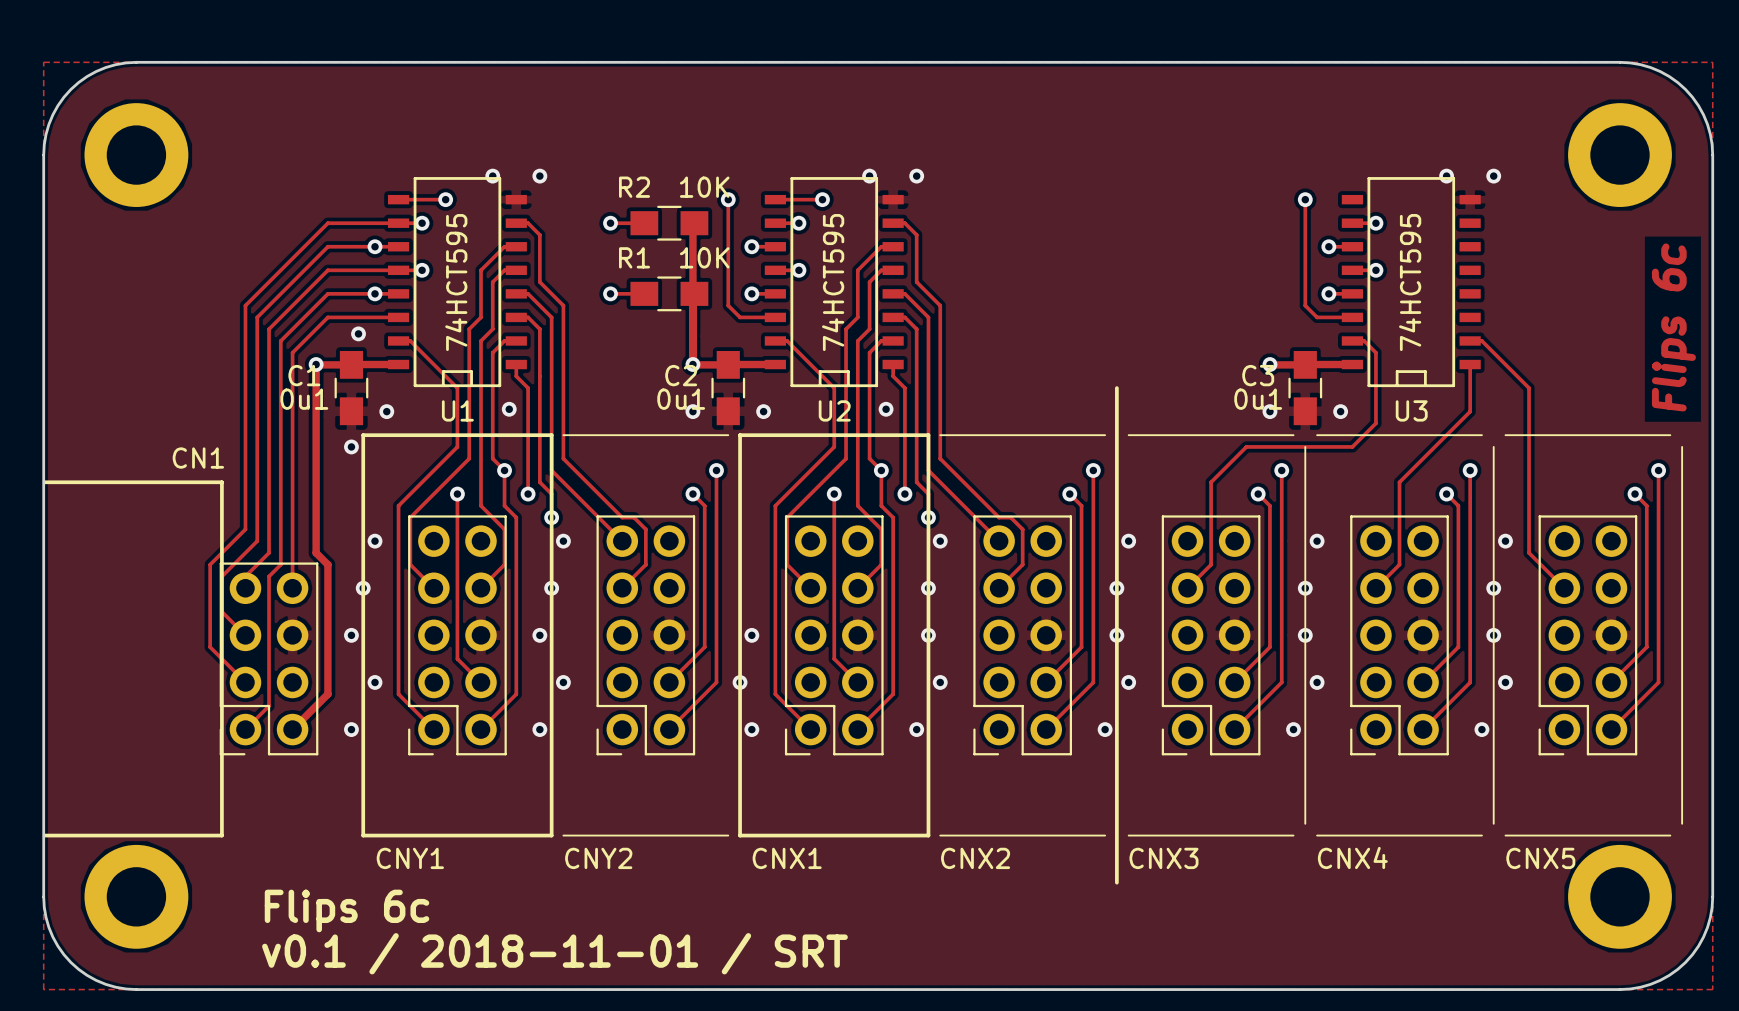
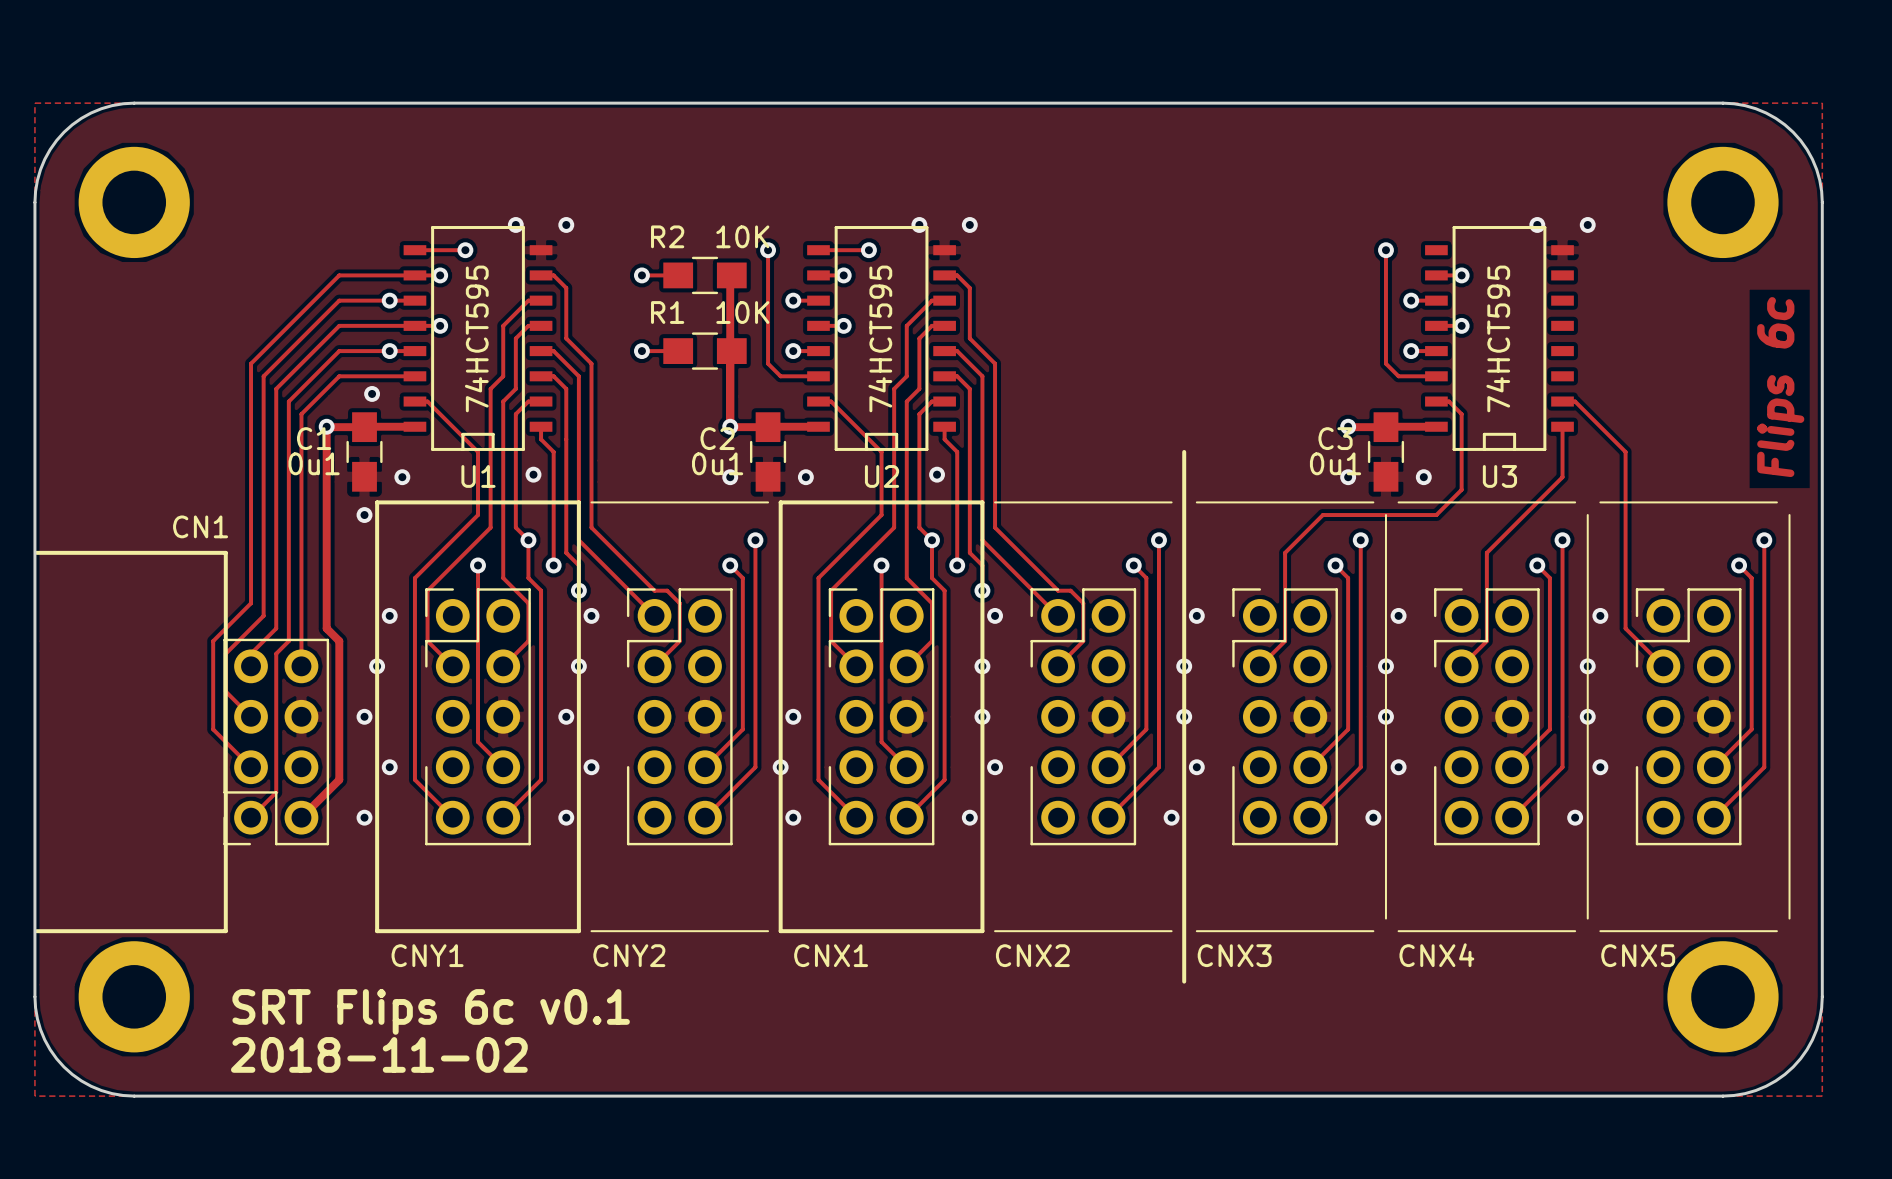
CNY1 footprint: [408, 515, 507, 756] -> [425, 588, 531, 846]
CNY2 footprint: [596, 515, 696, 756] -> [626, 588, 733, 846]
CNX1 footprint: [784, 515, 884, 756] -> [828, 588, 935, 846]
CNX2 footprint: [973, 515, 1073, 756] -> [1030, 588, 1137, 846]
CNX3 footprint: [1161, 515, 1261, 756] -> [1232, 588, 1338, 846]
CNX4 footprint: [1350, 515, 1449, 756] -> [1434, 588, 1540, 846]
CNX5 footprint: [1538, 515, 1638, 756] -> [1635, 588, 1742, 846]
text: Flips 6c (347, 910) -> SRT Flips 6c v0.1 (431, 1011)
text: none -> 2018-11-02 (379, 1054)
text: v0.1 / 2018-11-01 / SRT (554, 953) -> none

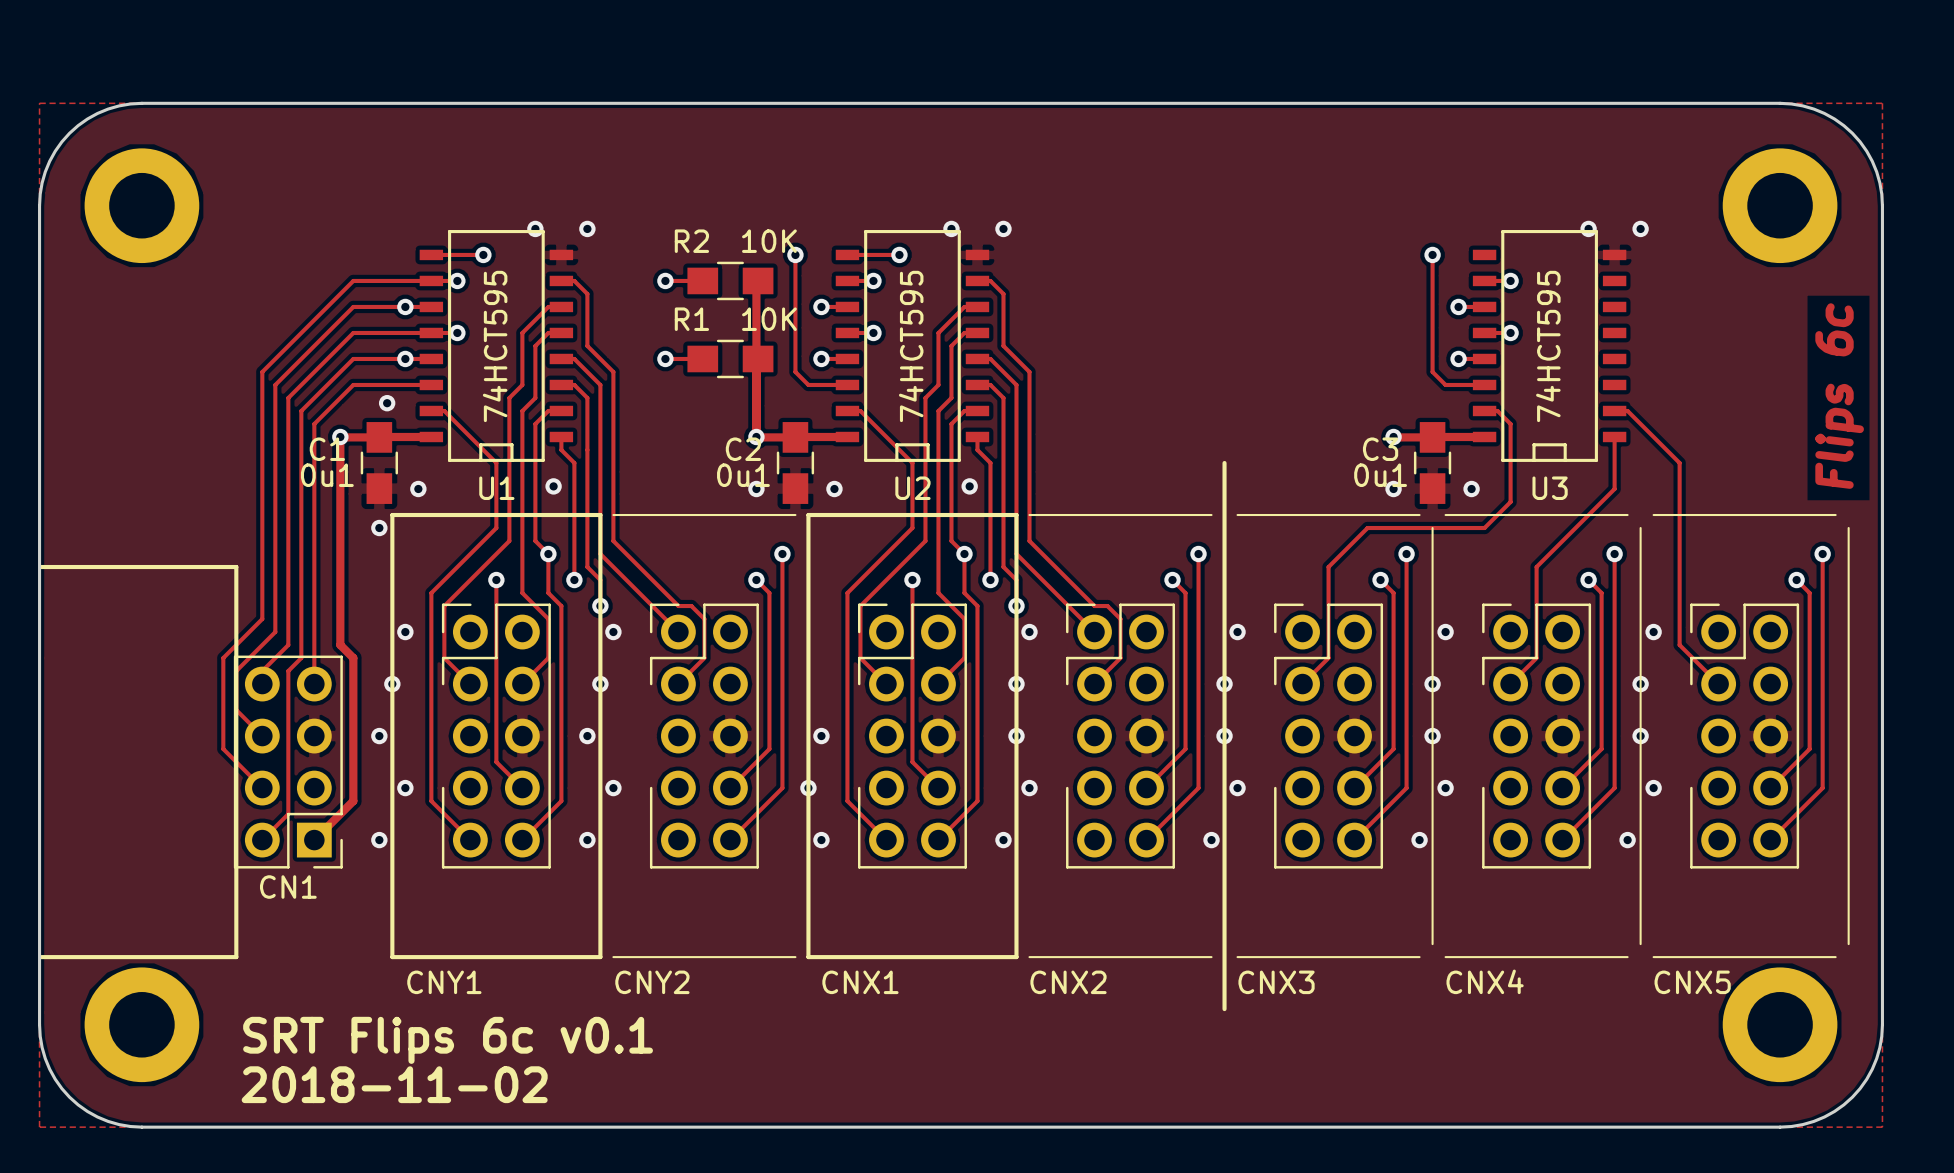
CN1 name position: CN1 (200, 526) -> CN1 (288, 887)
CN1 footprint: [223, 638, 330, 846] -> [233, 655, 343, 869]

